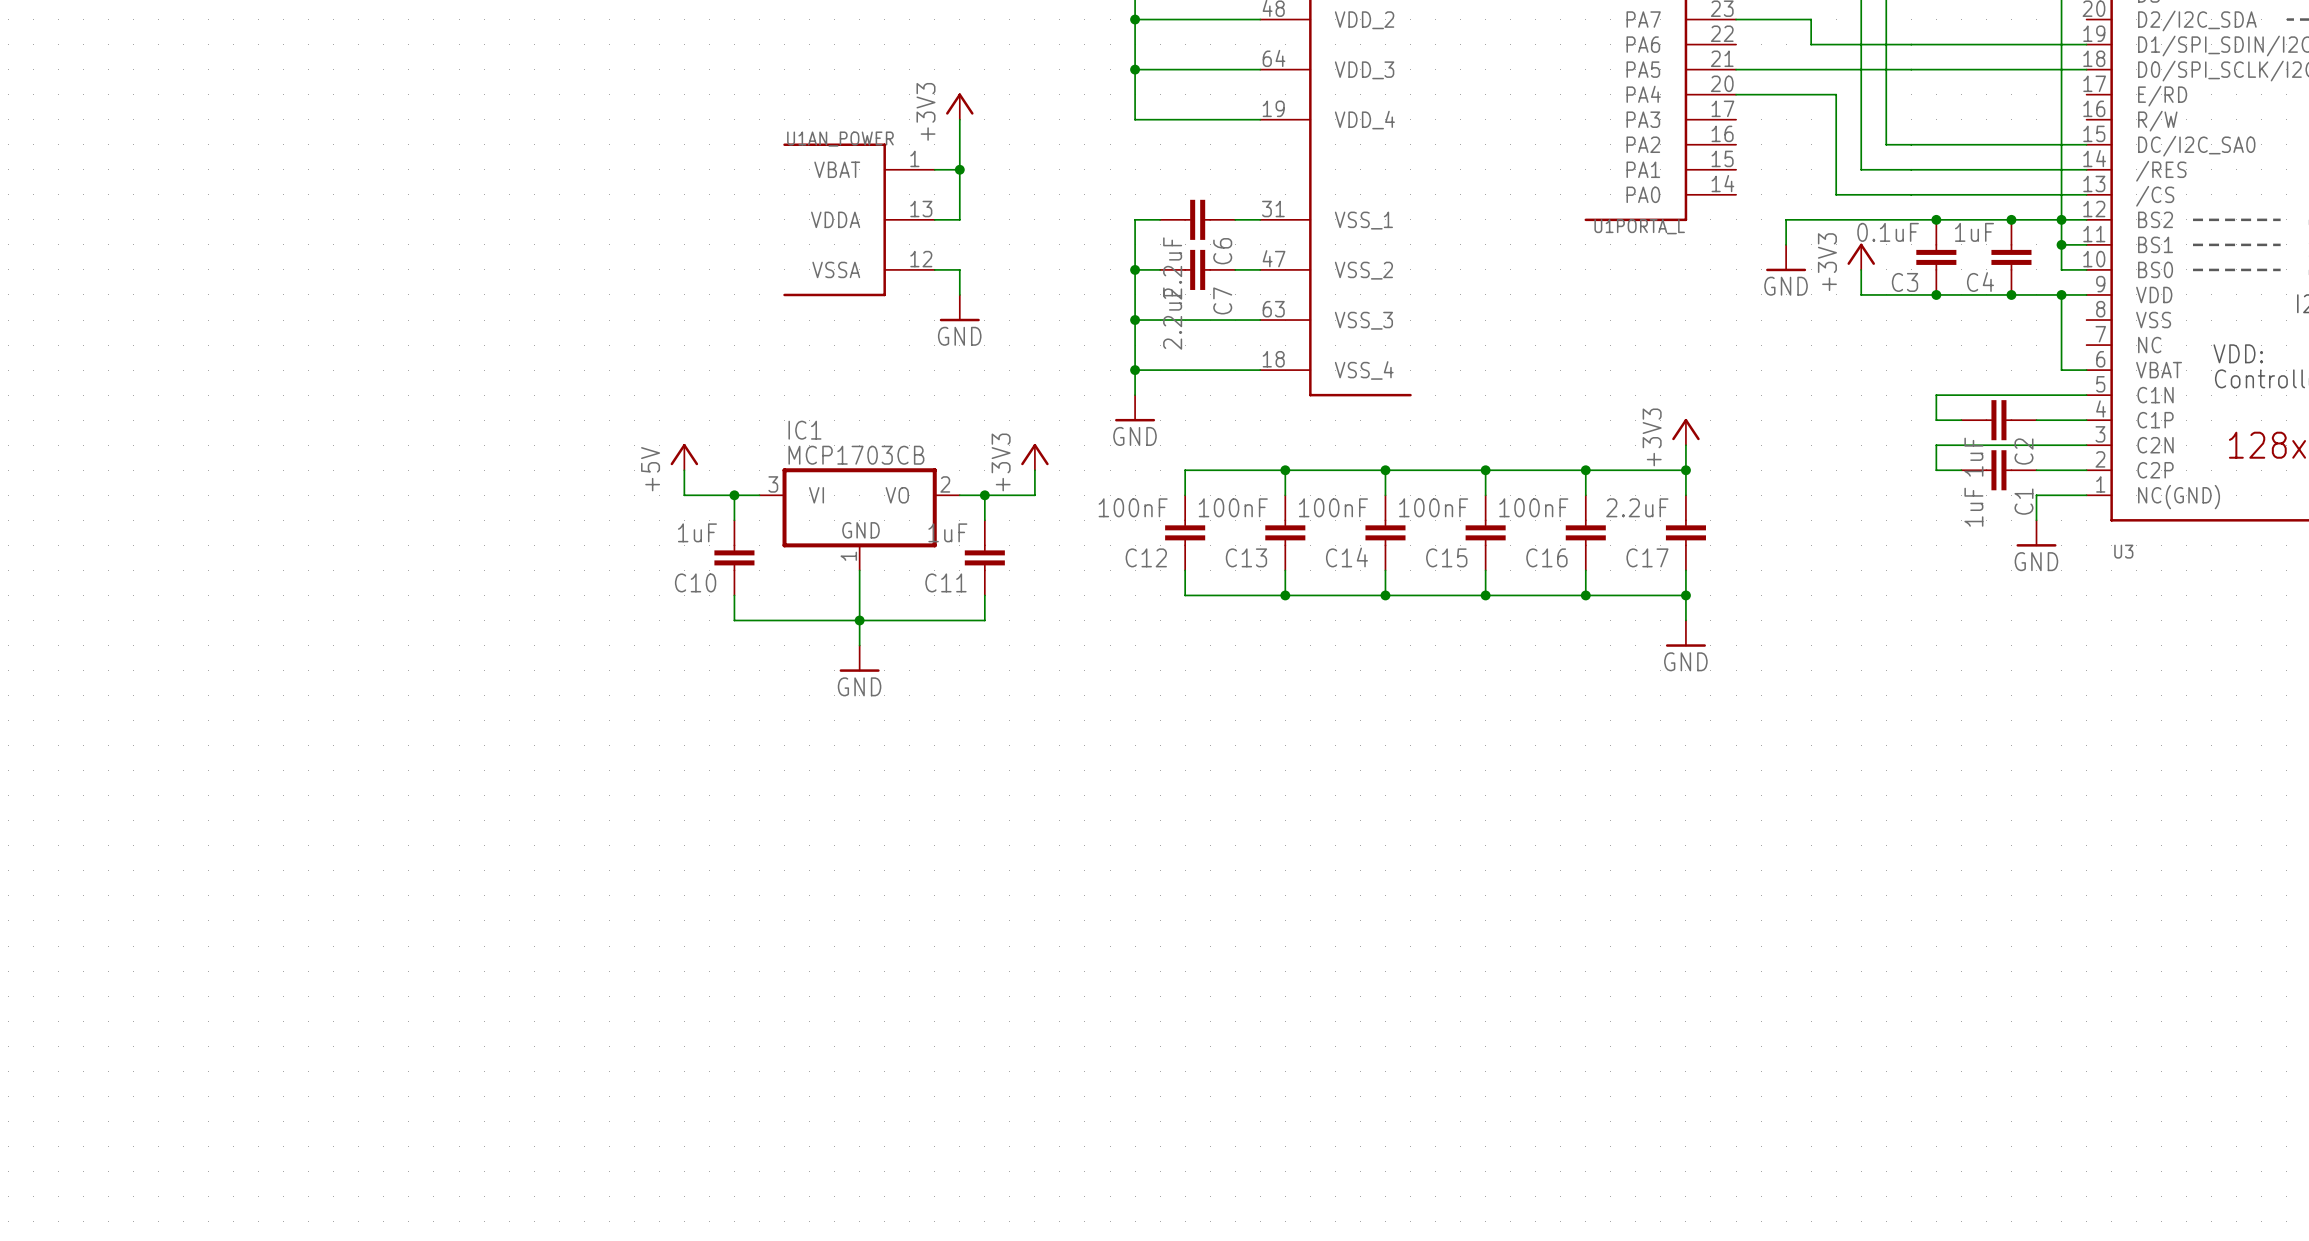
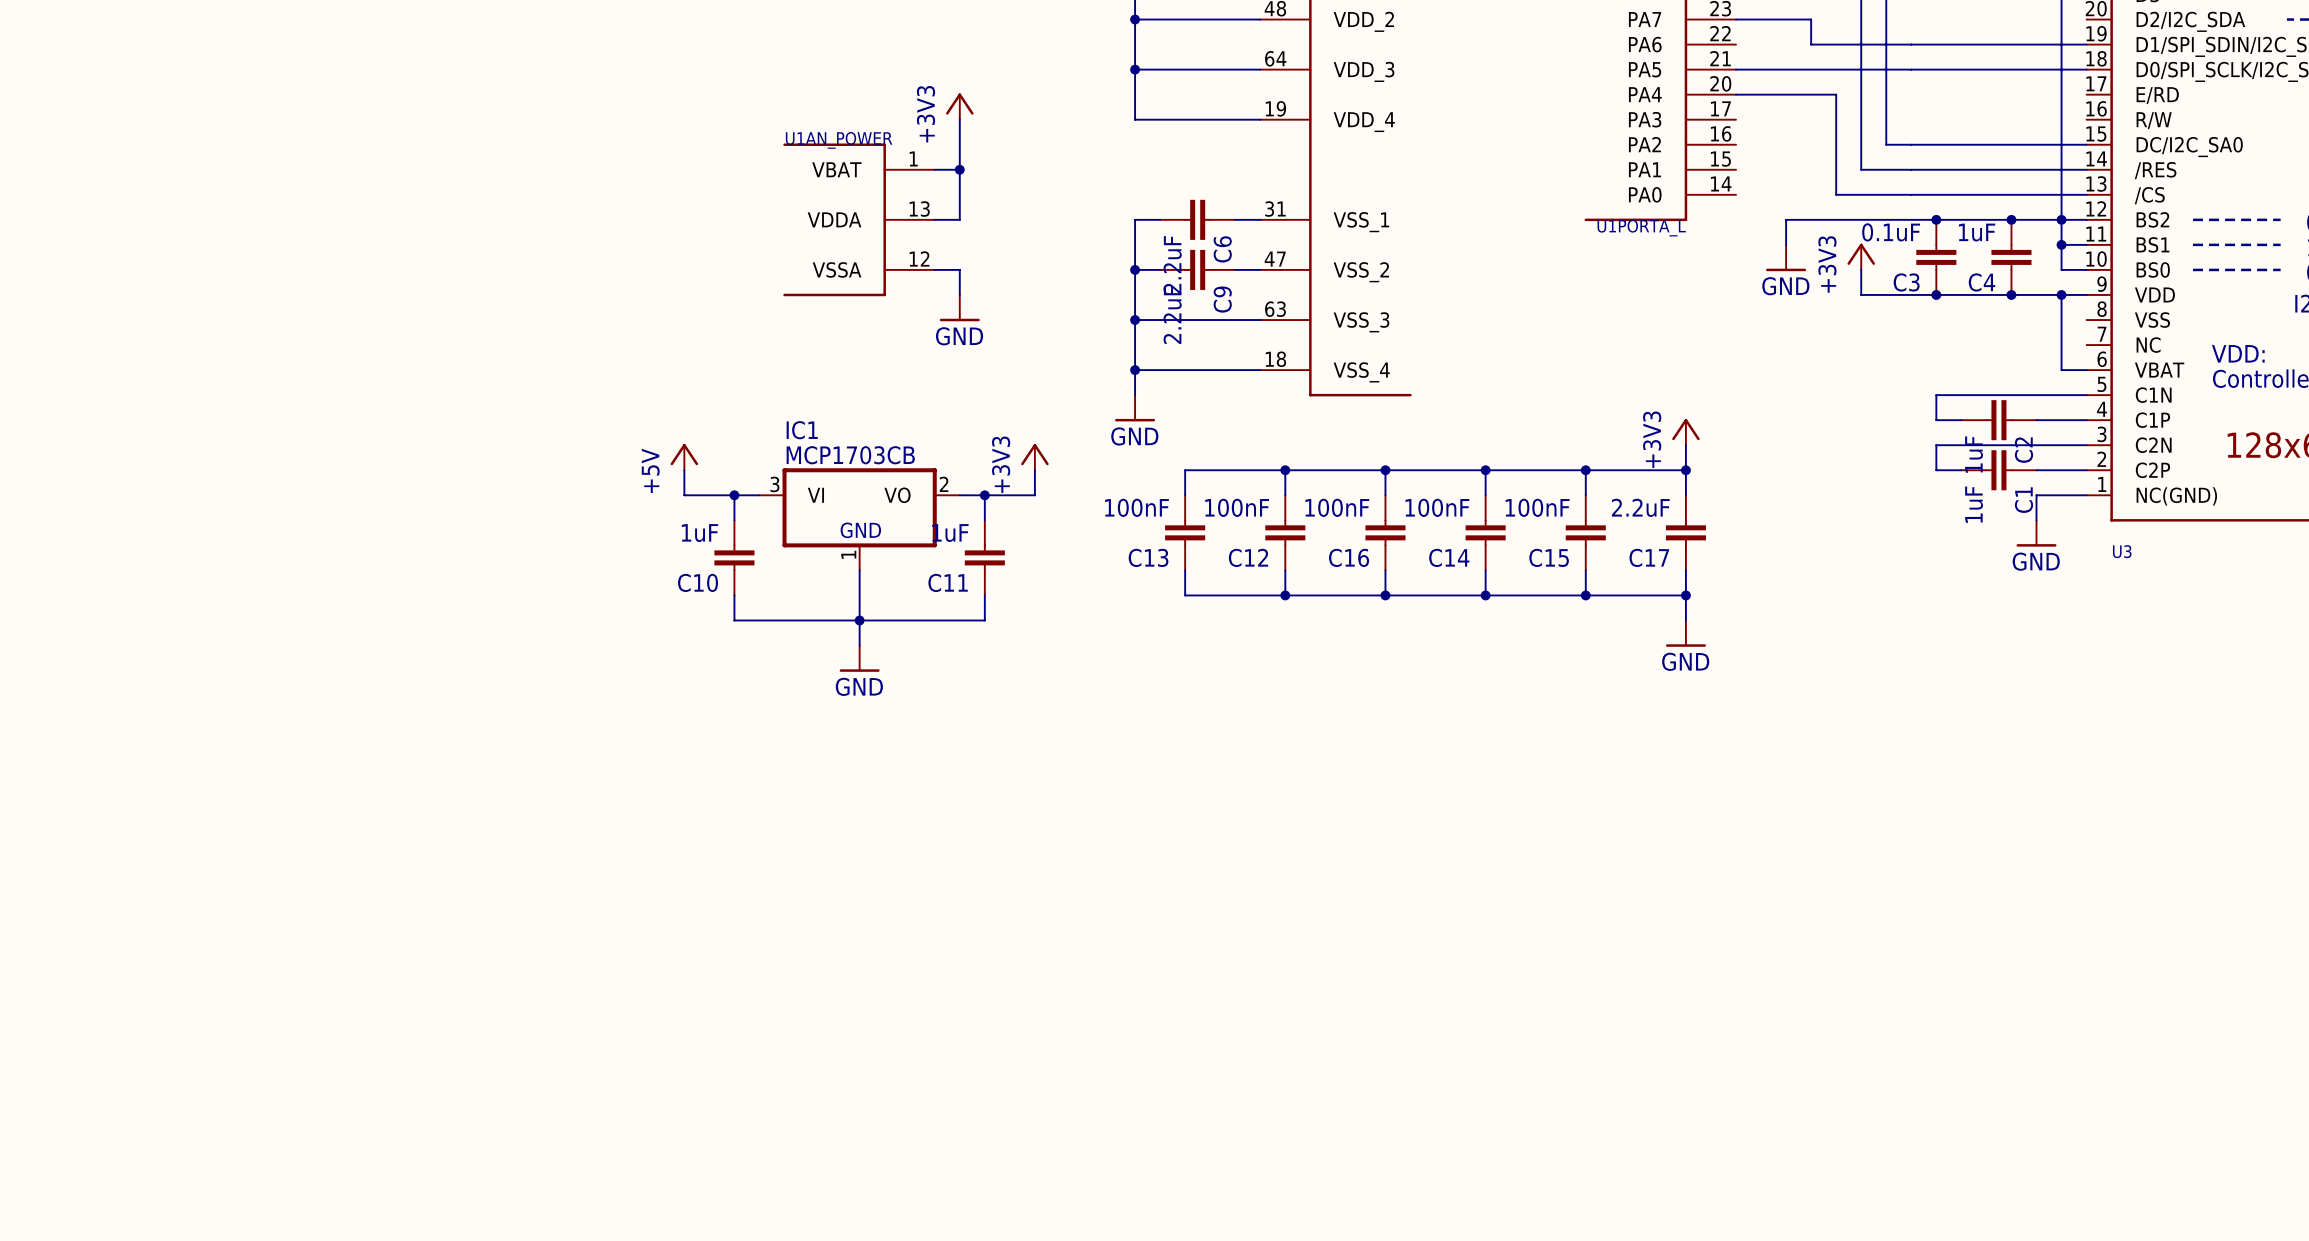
C7 name: C7 (1222, 300) -> C9 (1222, 299)
C12 name: C12 (1146, 557) -> C13 (1148, 557)
C13 name: C13 (1246, 557) -> C12 (1248, 557)
C14 name: C14 (1346, 557) -> C16 (1349, 557)
C15 name: C15 (1446, 557) -> C14 (1449, 557)
C16 name: C16 (1546, 557) -> C15 (1549, 557)

